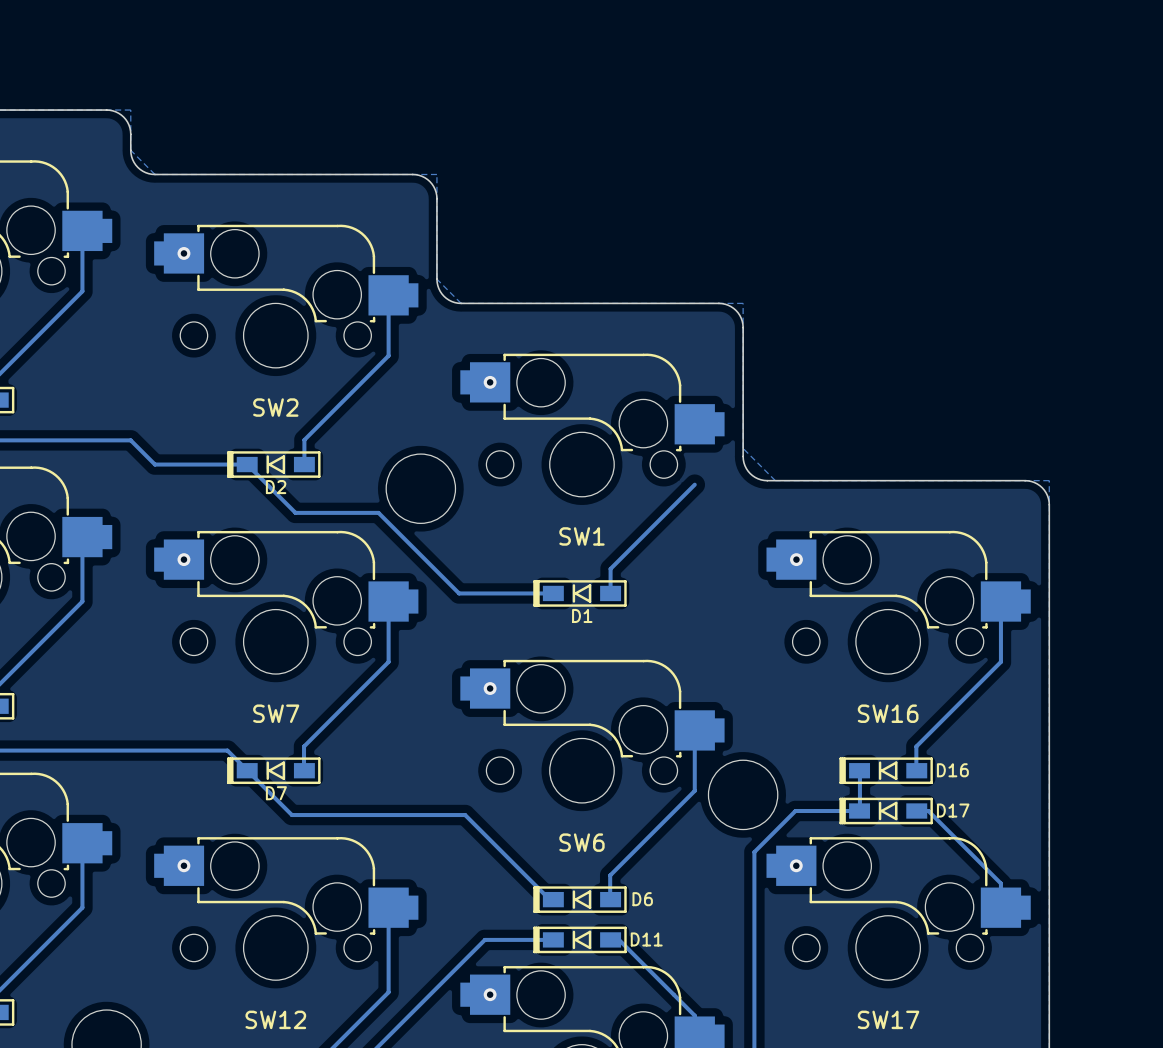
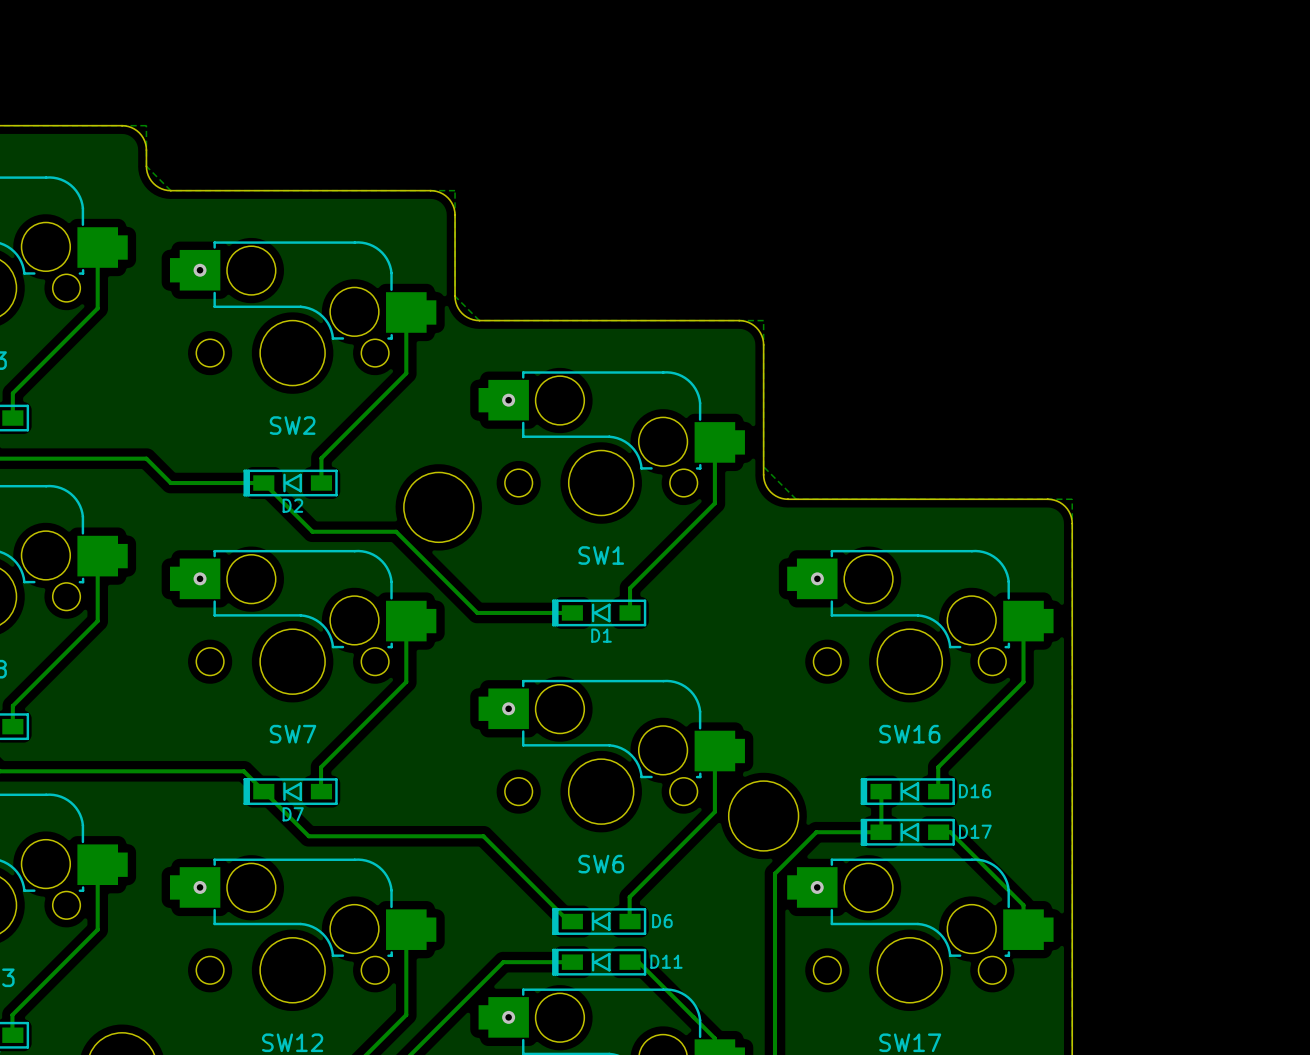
track: none -> (714, 442) (714, 503)

